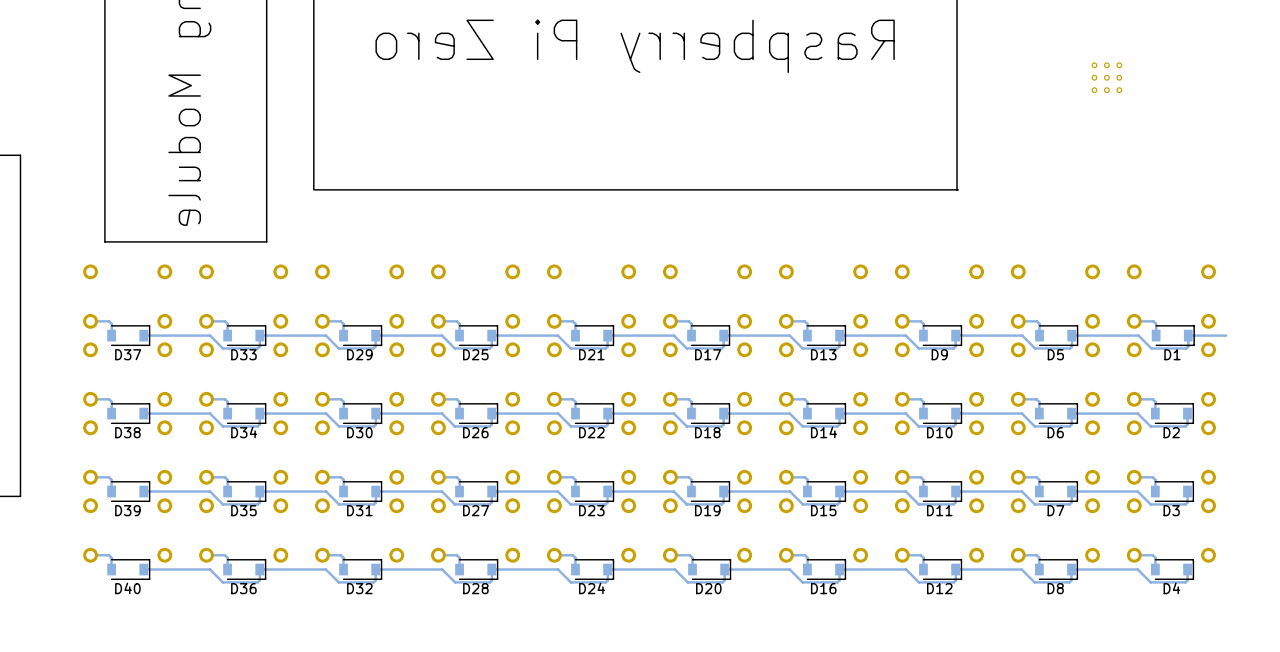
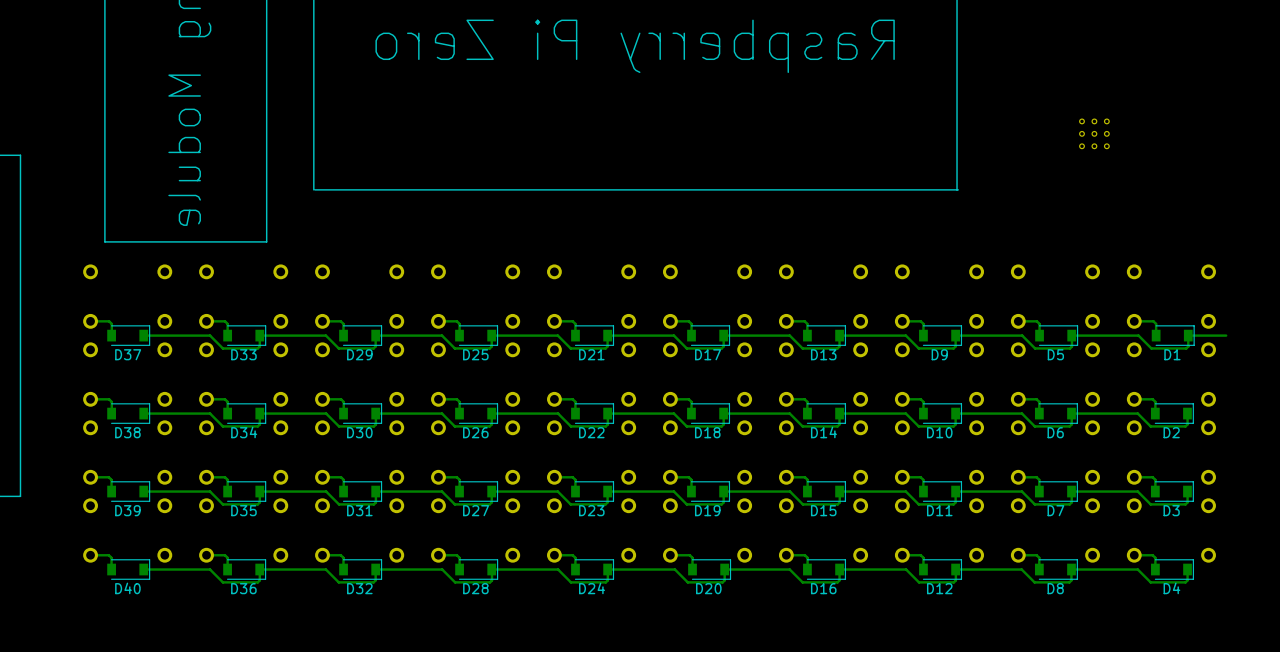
part position: (1106, 77) -> (1094, 133)

